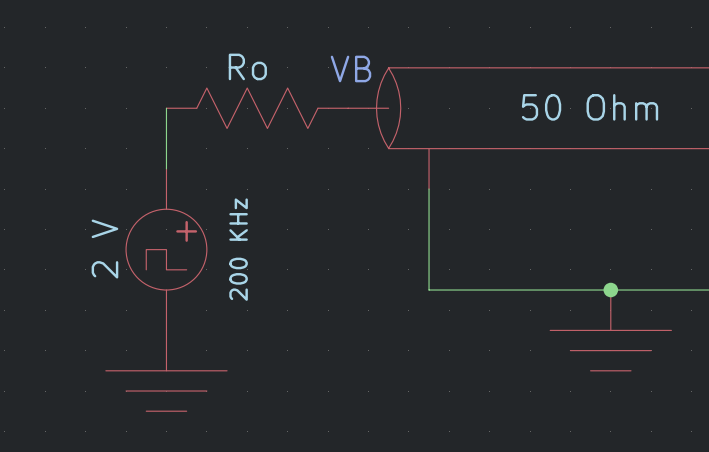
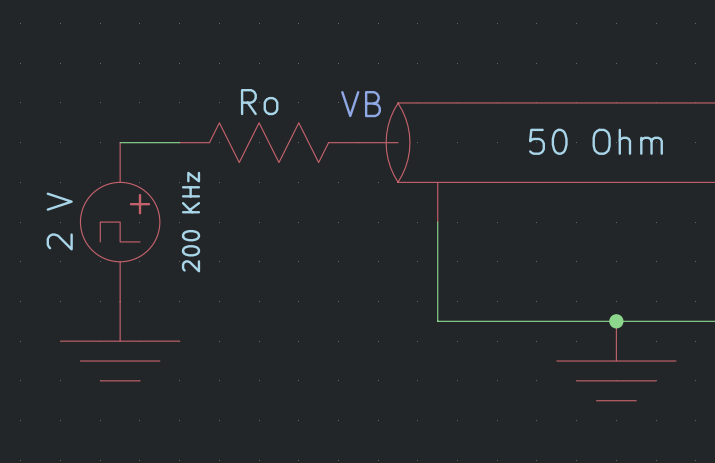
wire: (166, 108) (166, 168) -> (179, 142) (120, 142)
2 V position: (166, 249) -> (120, 222)
power symbol position: (166, 370) -> (120, 341)

